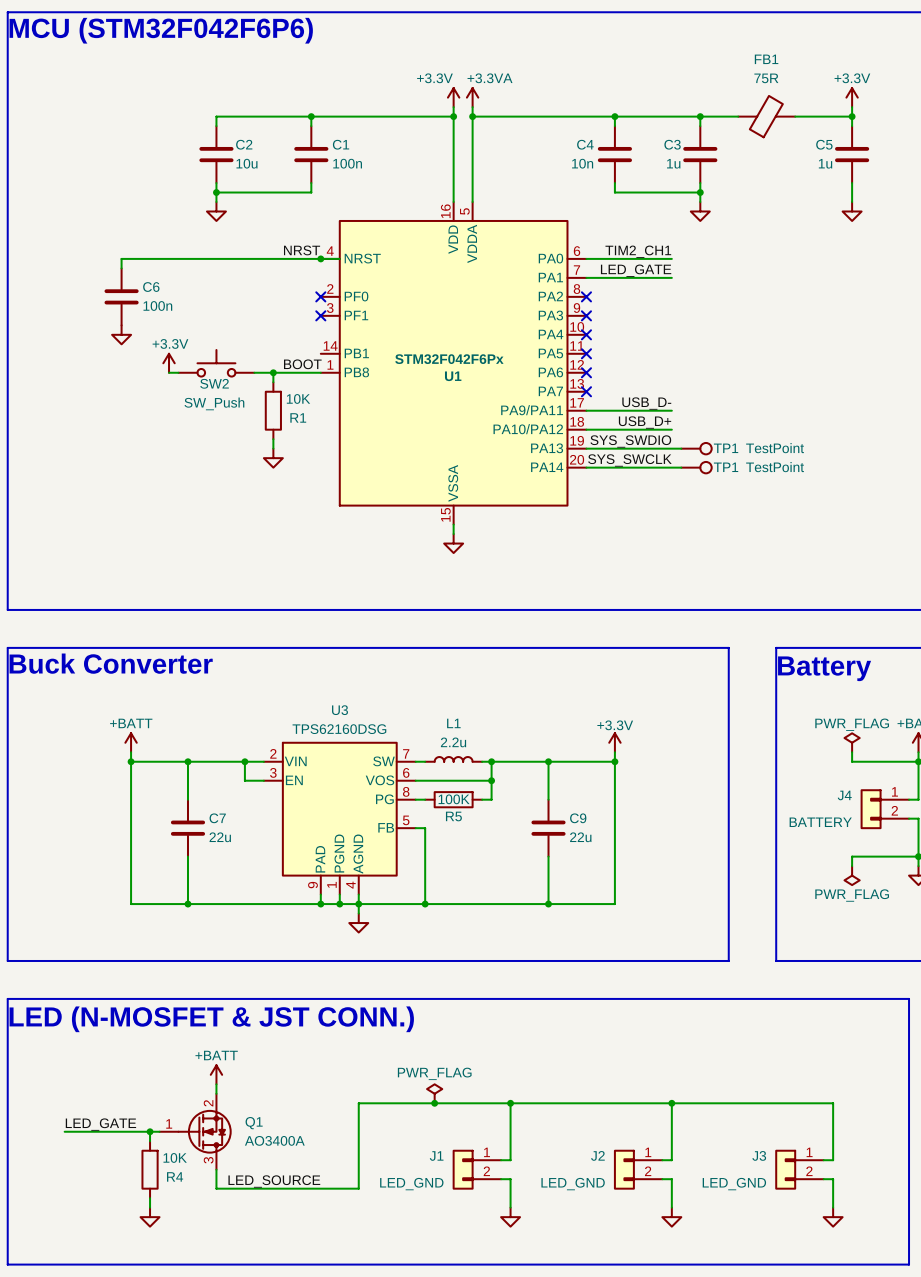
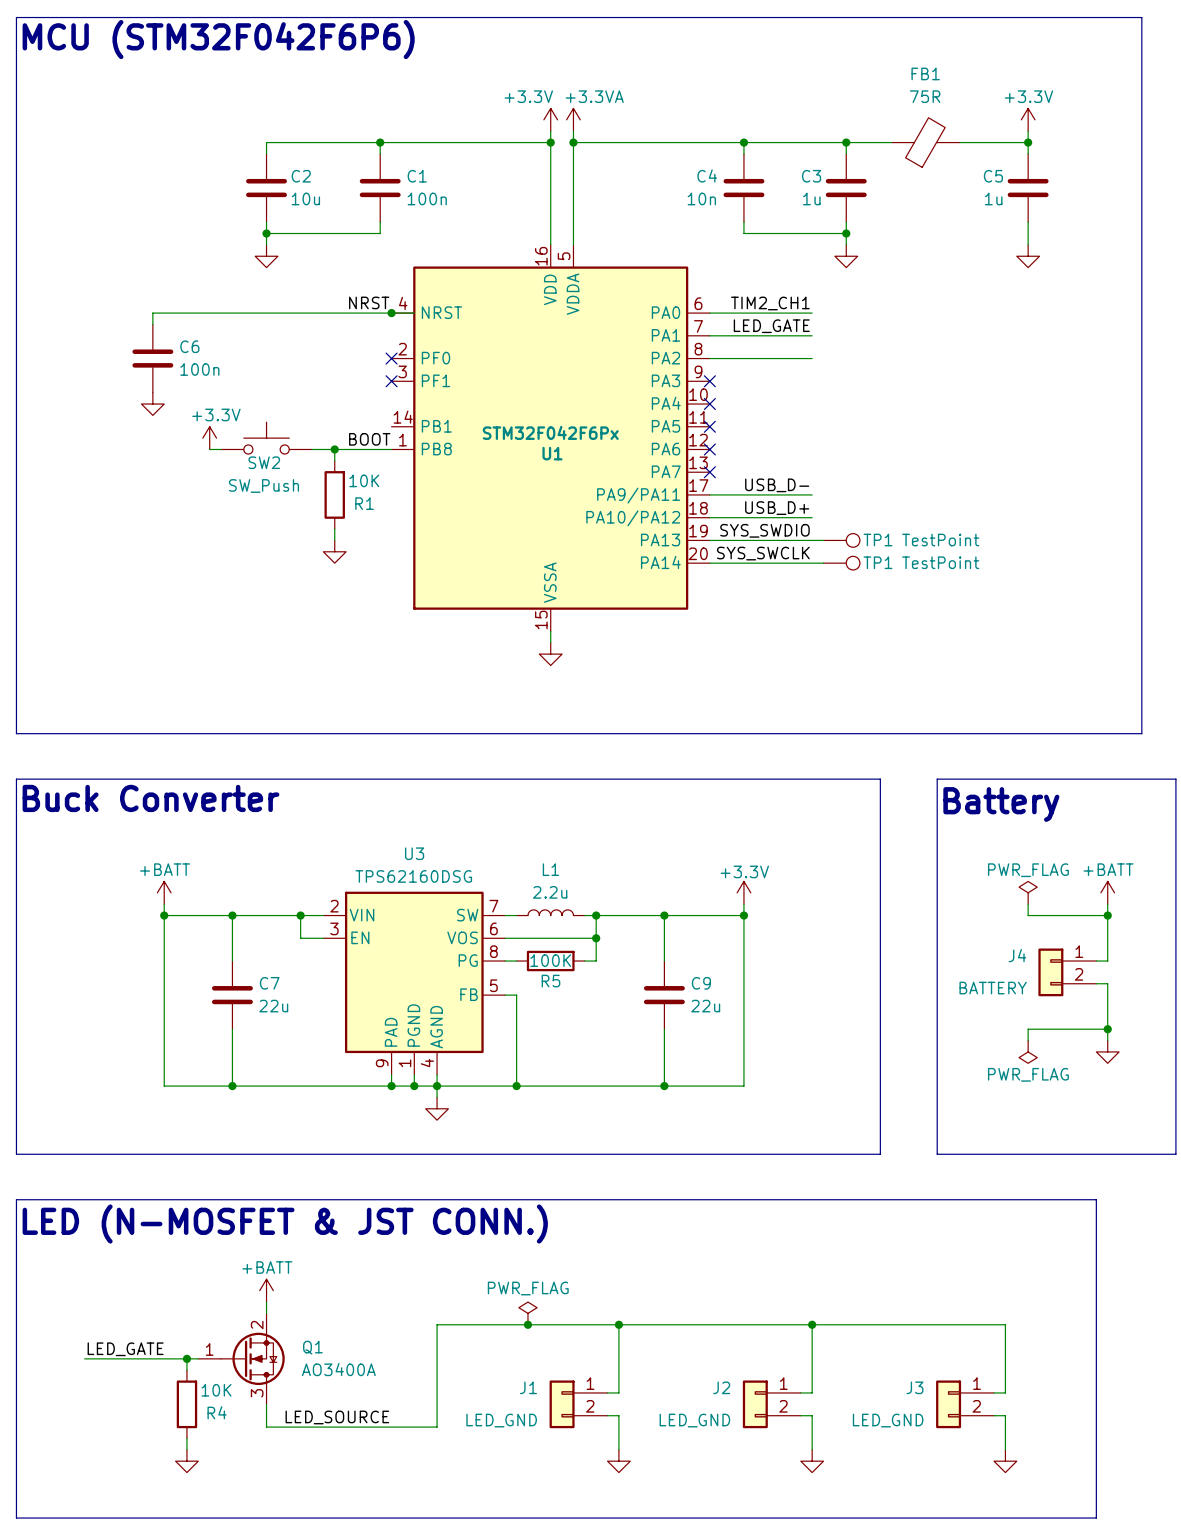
wire: none -> (709, 358) (812, 358)
no-connect mark: (586, 296) -> none

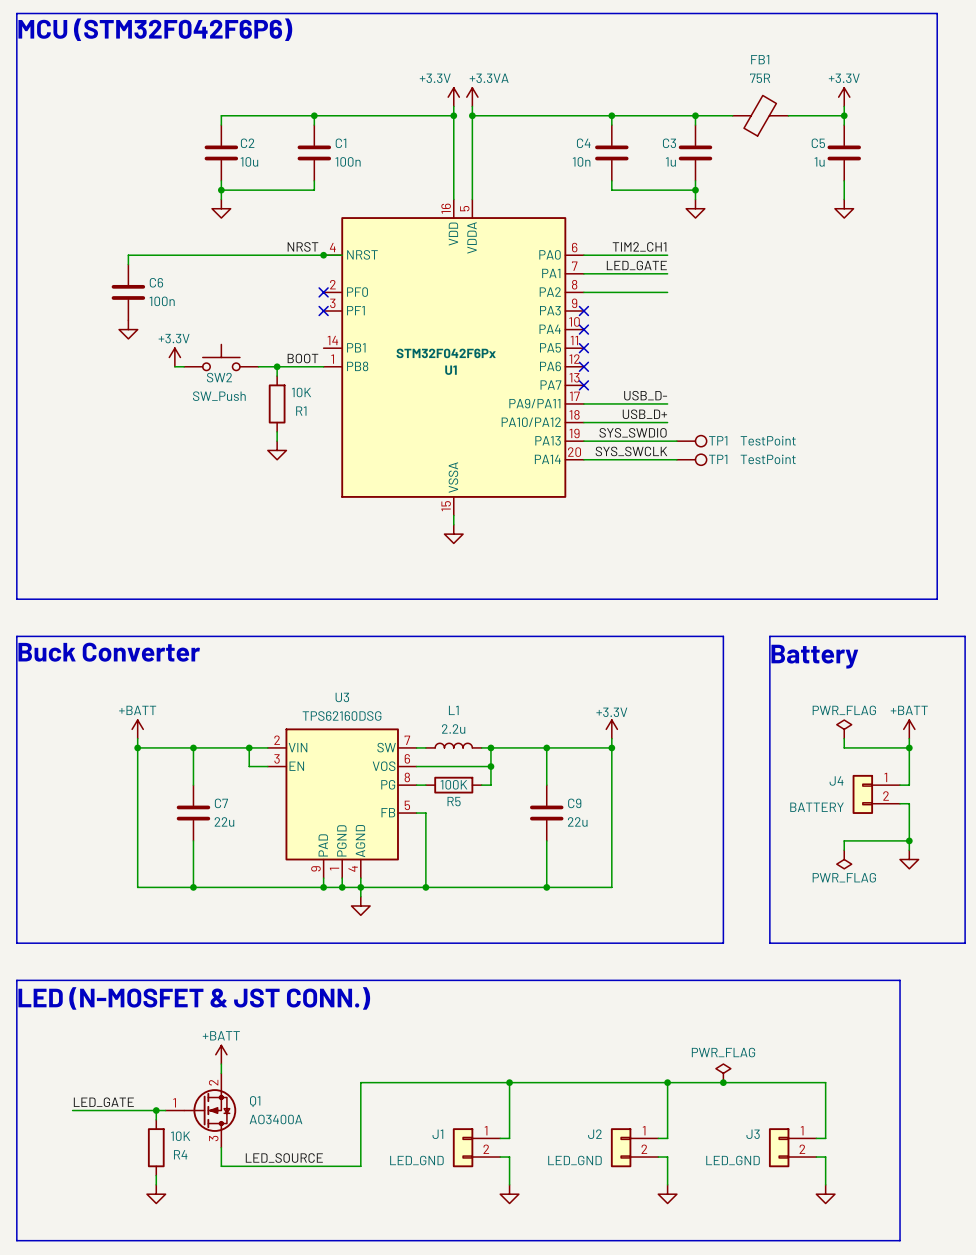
power symbol: PWR_FLAG (527, 1313) -> none
power symbol: none -> PWR_FLAG (723, 1073)
junction: (527, 1324) -> none
junction: none -> (723, 1082)

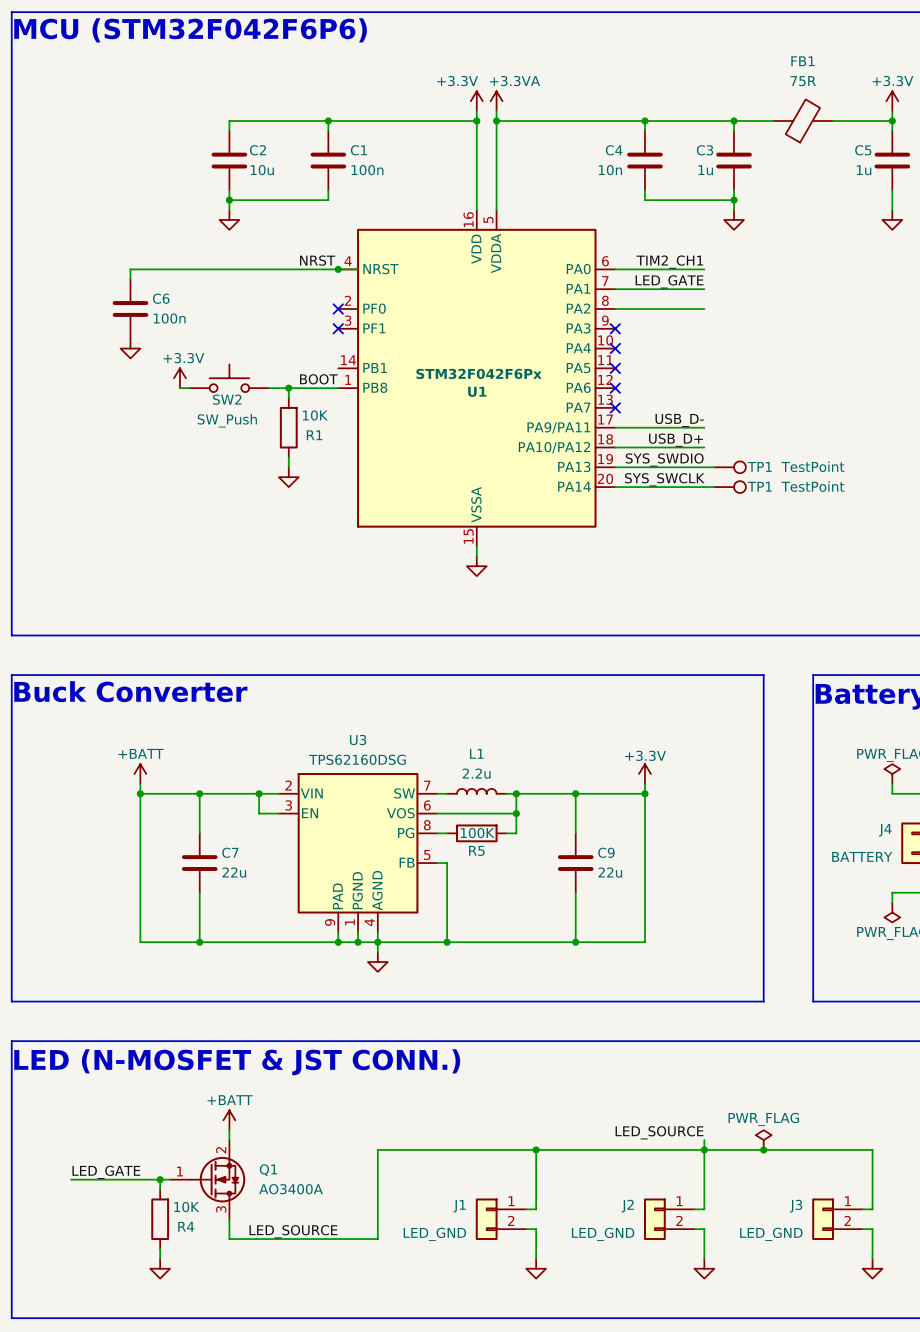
label: none -> LED_SOURCE (659, 1132)
wire: none -> (704, 1140) (704, 1149)

